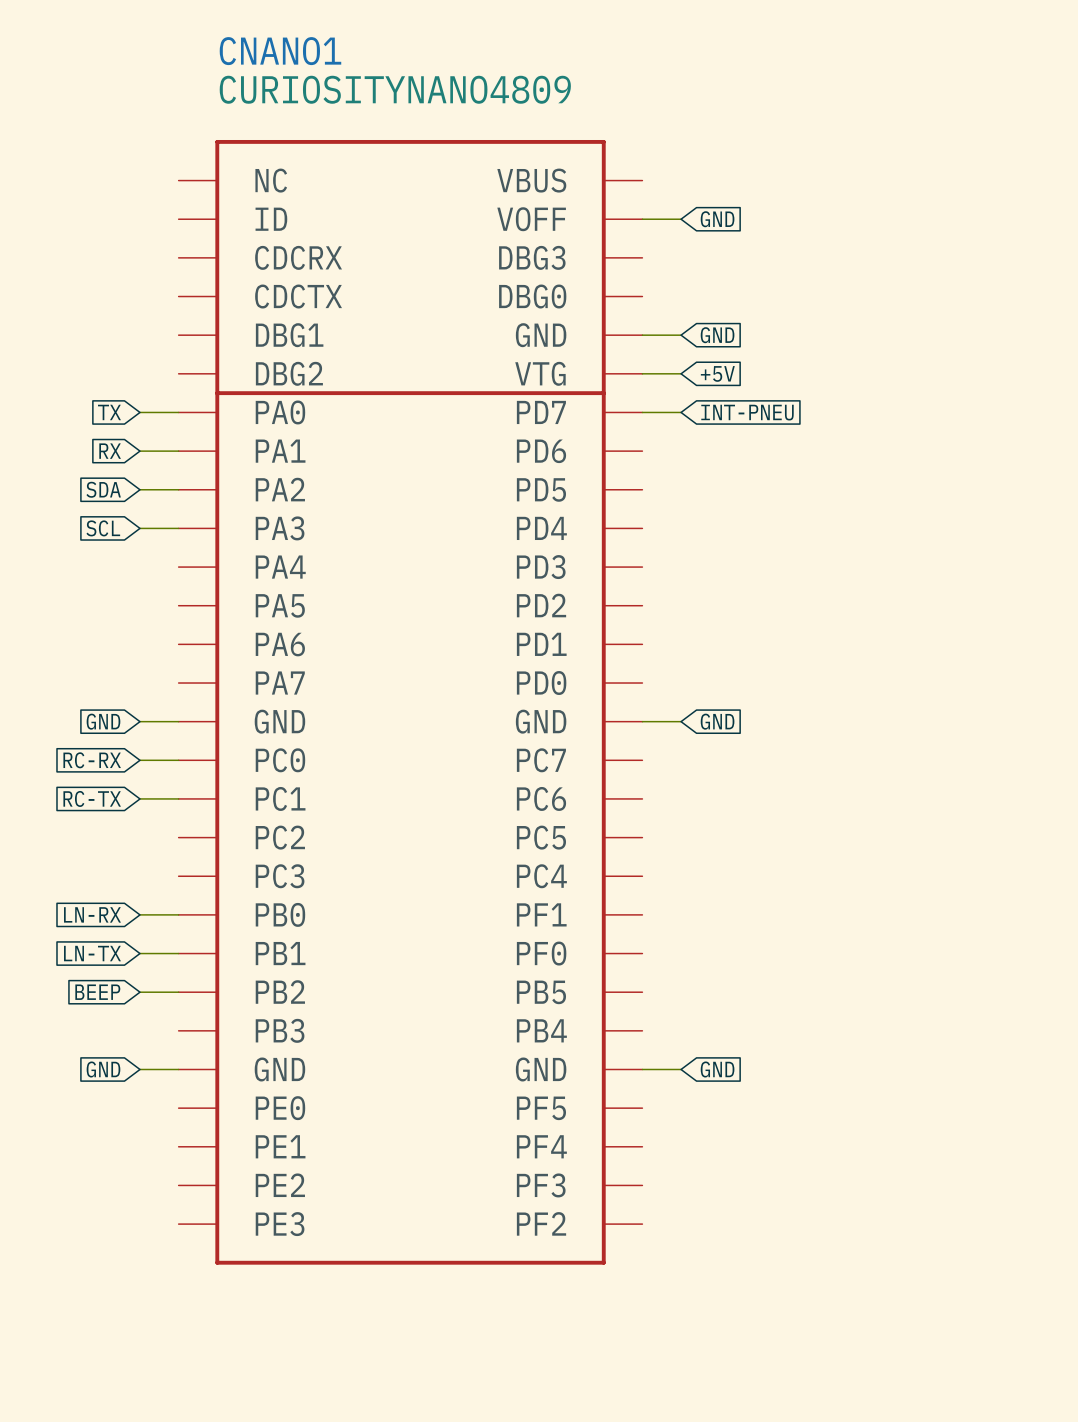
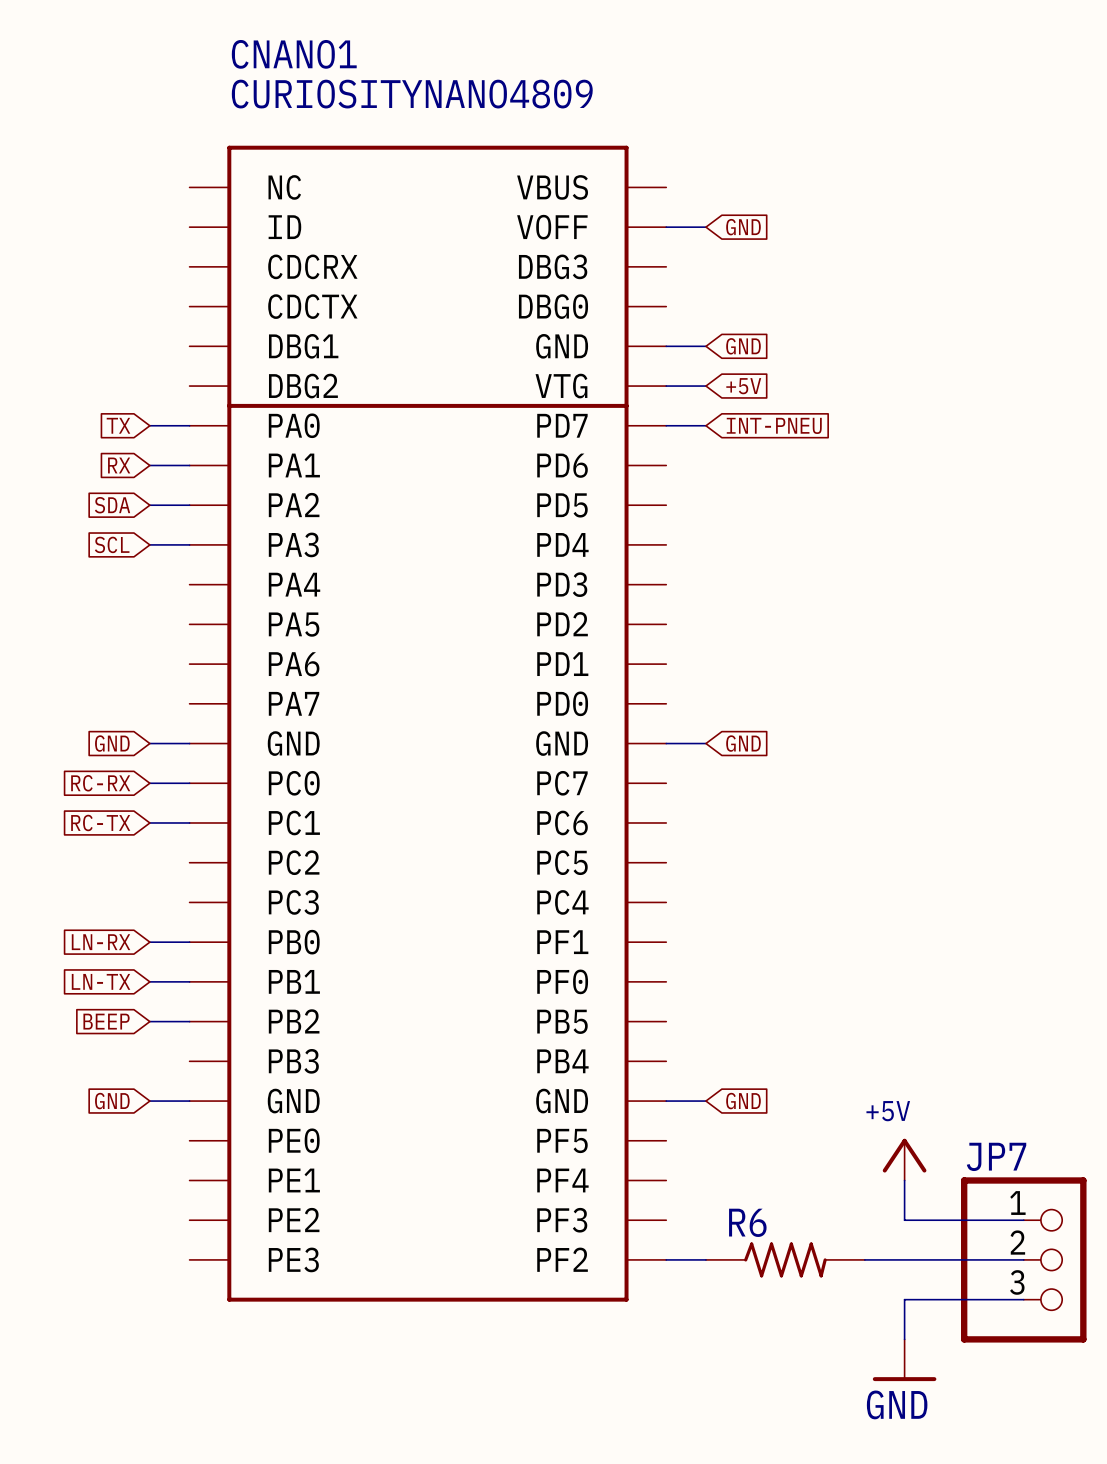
power symbol: none -> +5V (904, 1159)
wire: none -> (904, 1180) (904, 1220) (1023, 1220)
wire: none -> (666, 1259) (705, 1259)
R6: none -> (785, 1259)
wire: none -> (864, 1259) (1023, 1259)
JP7: none -> (1023, 1259)
wire: none -> (1023, 1299) (904, 1299) (904, 1339)
power symbol: none -> GND (904, 1360)

